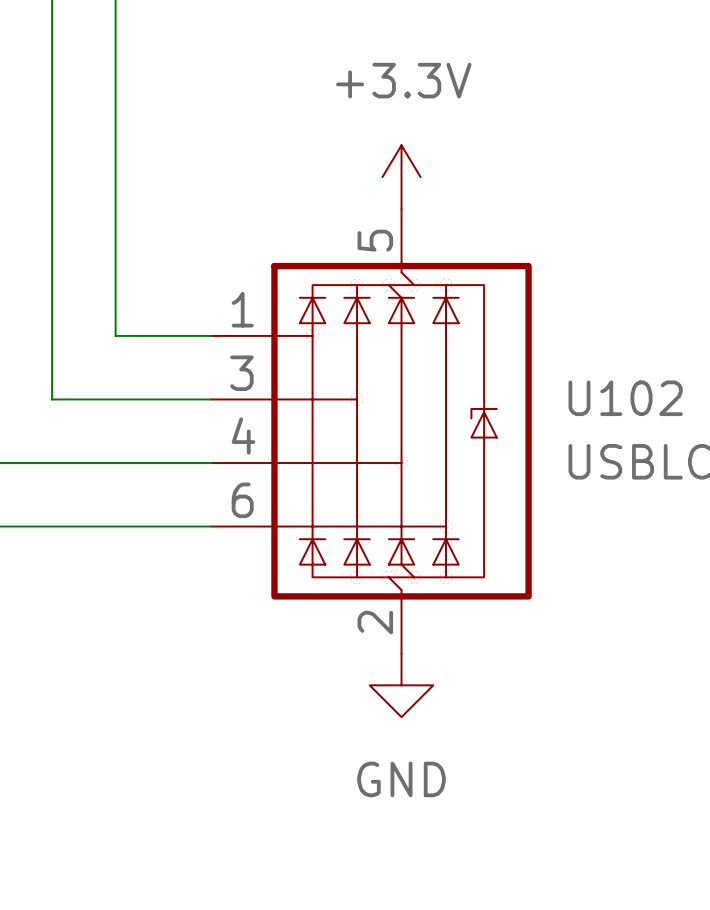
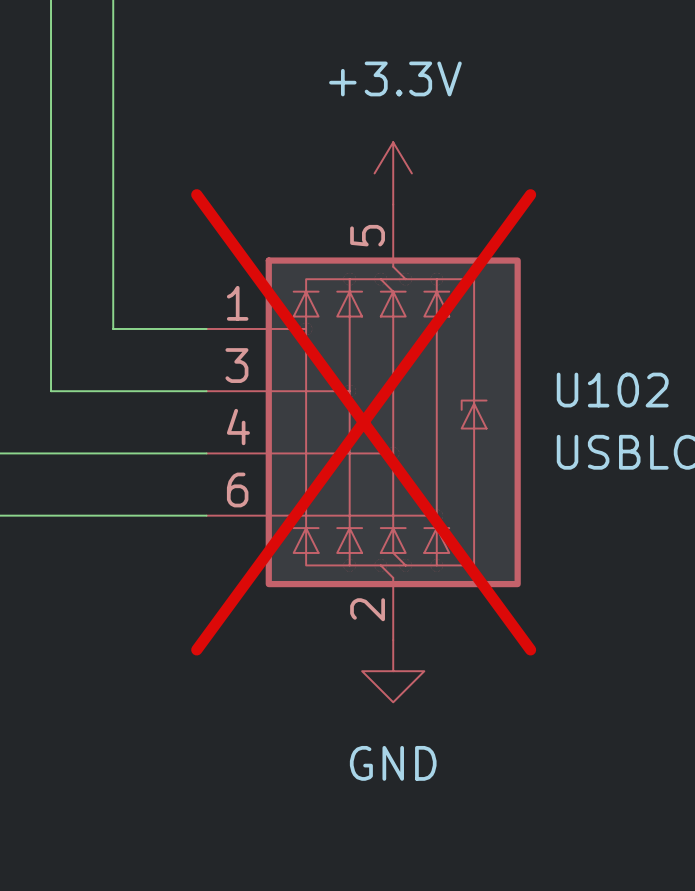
U102 do-not-place cross: none -> (363, 422)

